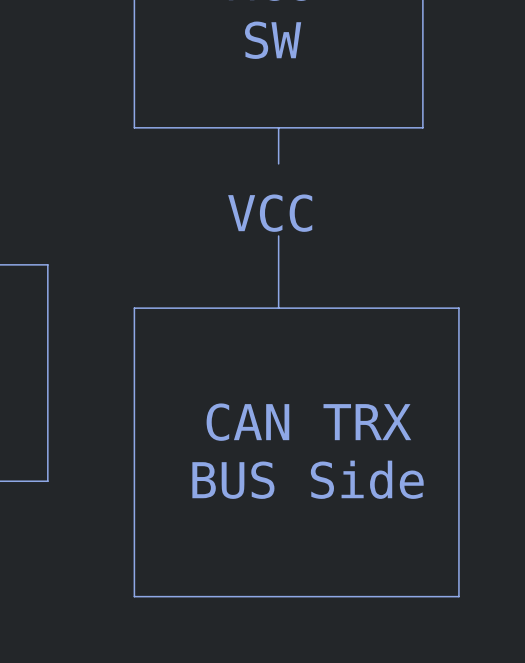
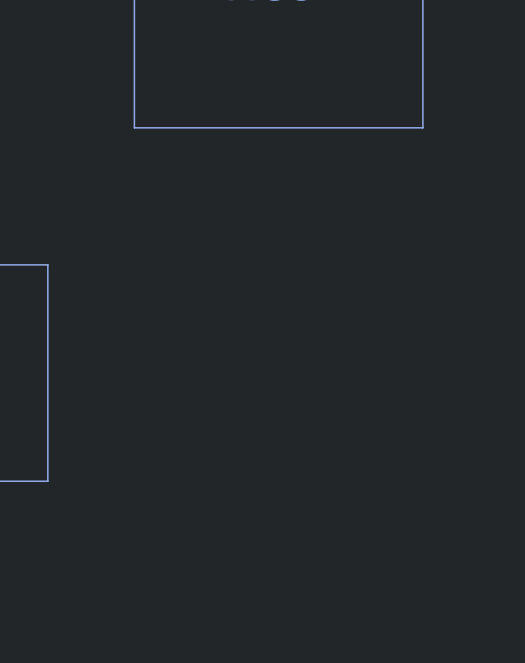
text: SW (273, 40) -> none
line: (278, 127) (278, 163) -> none
text: VCC (270, 213) -> none
line: (278, 236) (278, 308) -> none
line: (134, 308) (458, 308) (458, 596) (134, 596) (134, 308) -> none
text: CAN TRX (308, 422) -> none
text: BUS Side (308, 479) -> none

